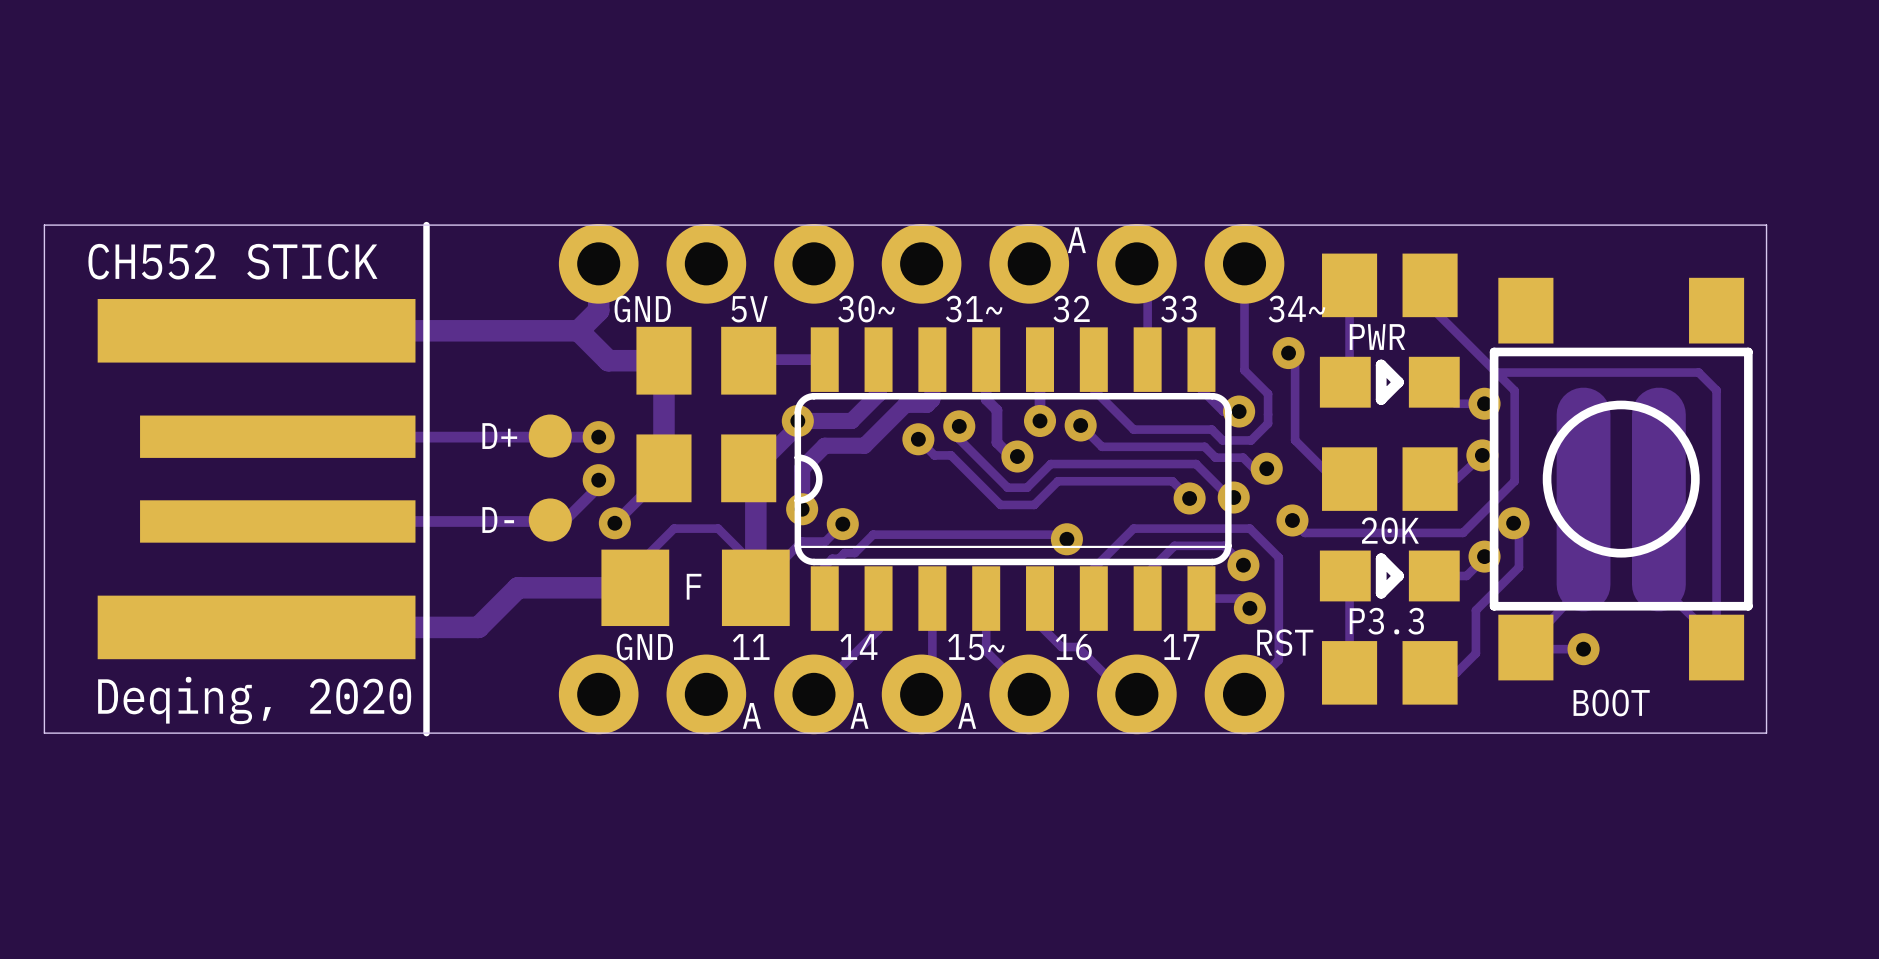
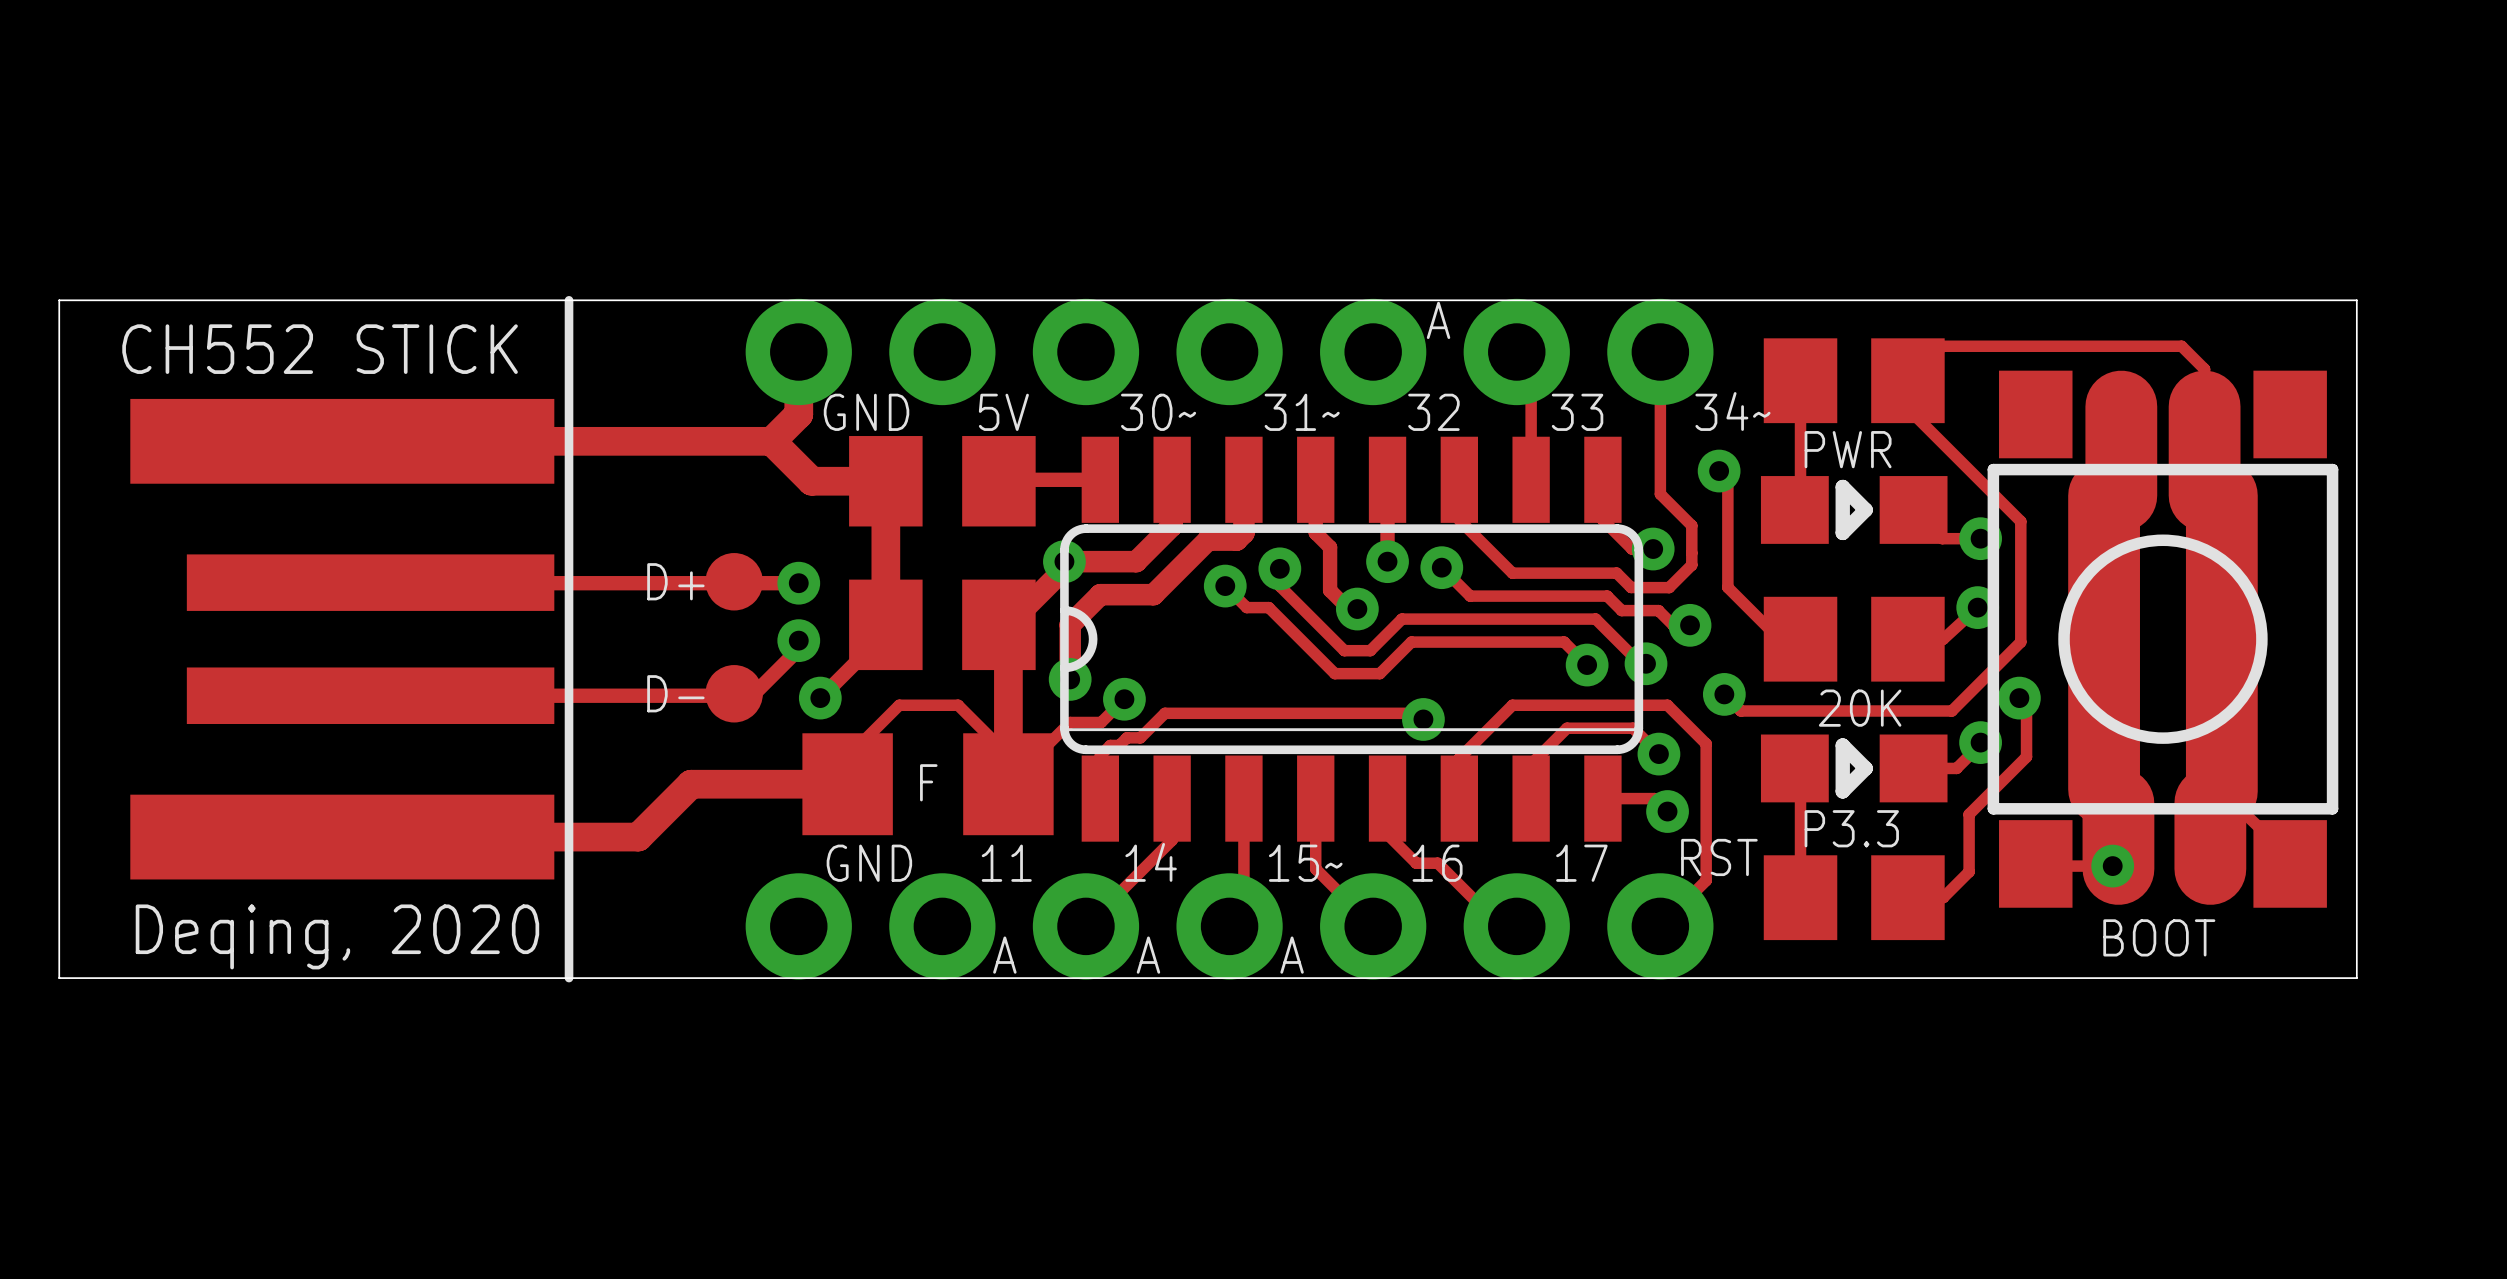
track: none -> (2121, 406) (2121, 495) (2104, 495) (2104, 789) (2118, 803) (2118, 868) (2112, 866)
track: none -> (1913, 413) (1913, 385) (1907, 380) (1942, 346) (2181, 346) (2204, 369) (2204, 495) (2221, 495) (2221, 791)
track: (1496, 372) (1698, 372) (1716, 390) (1716, 642) -> (2210, 868) (2210, 802) (2218, 794) (2218, 788) (2290, 857)
track: (1583, 414) (1583, 584) (1525, 647) -> none
track: (1658, 414) (1658, 584) (1716, 640) -> none

